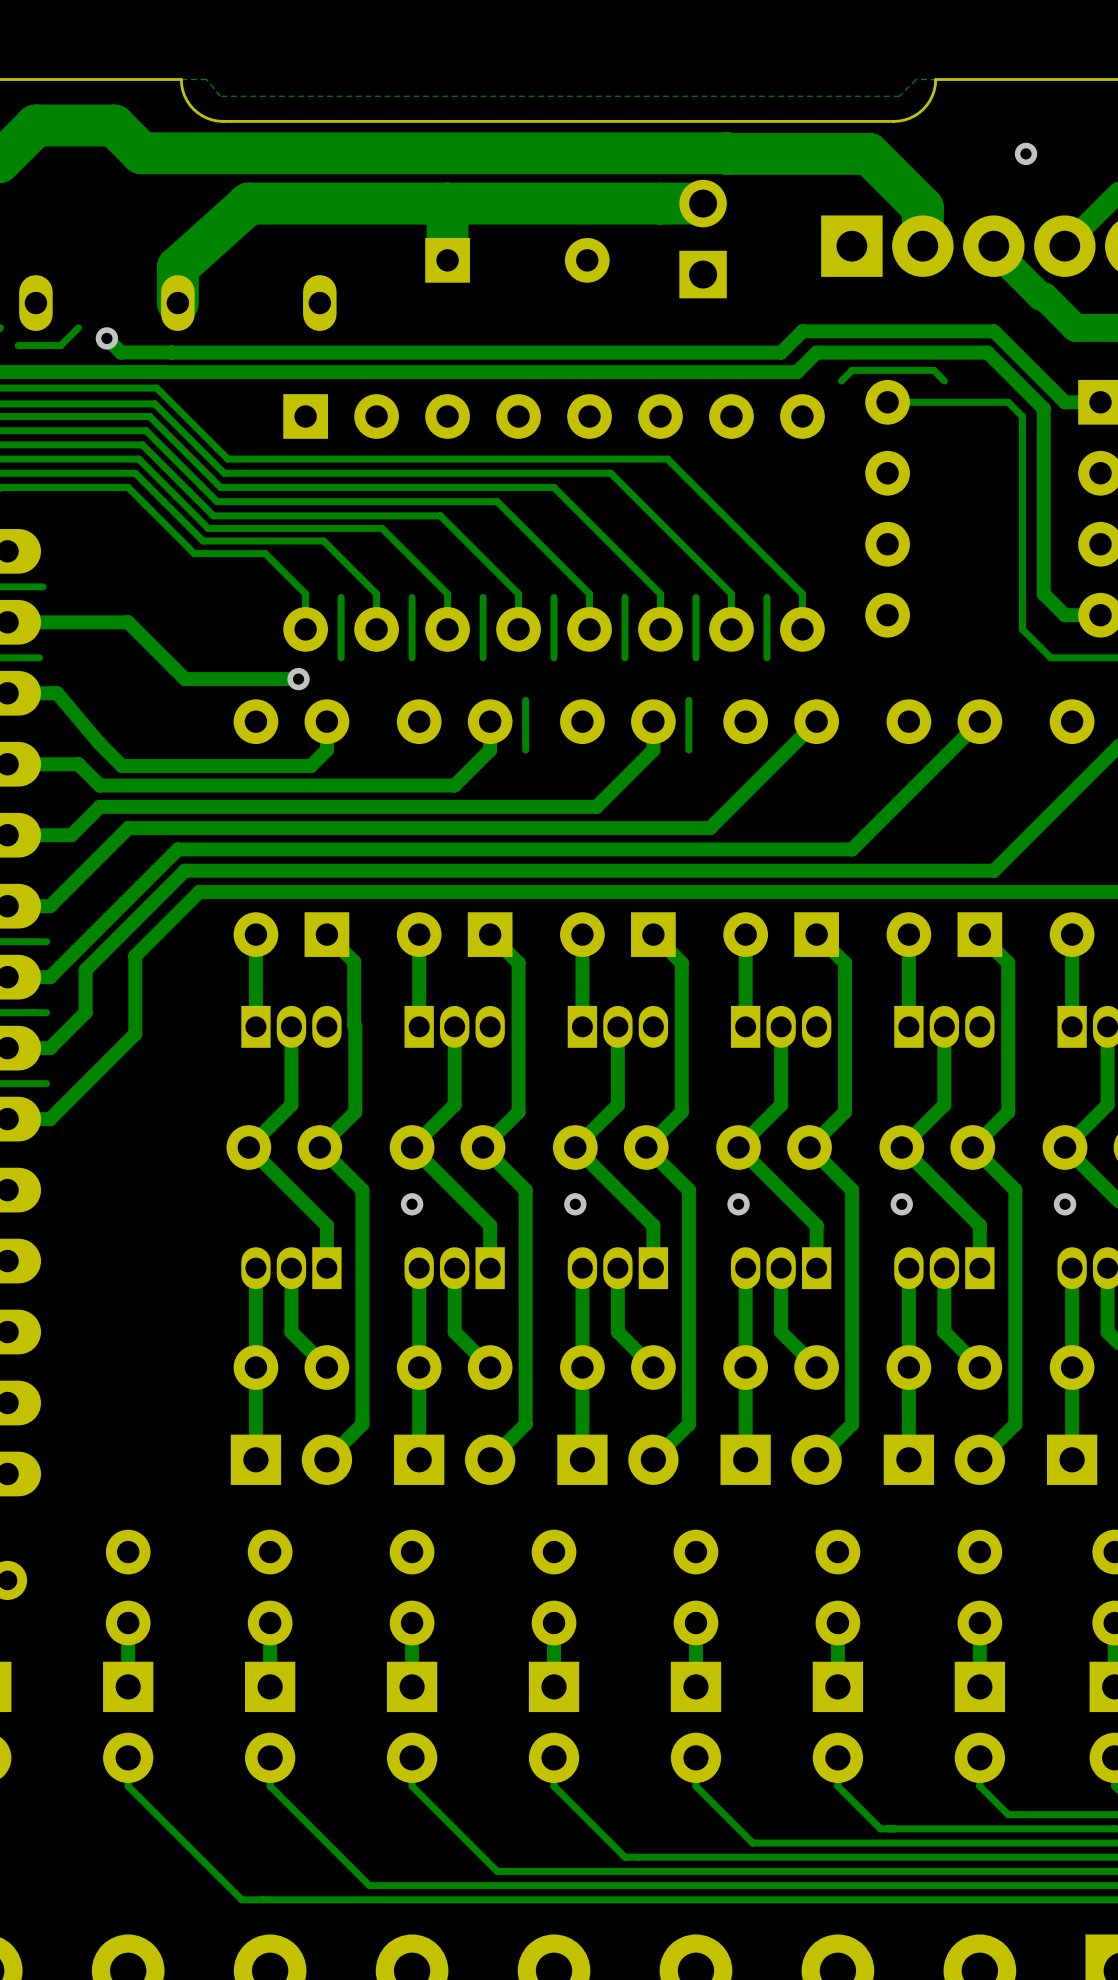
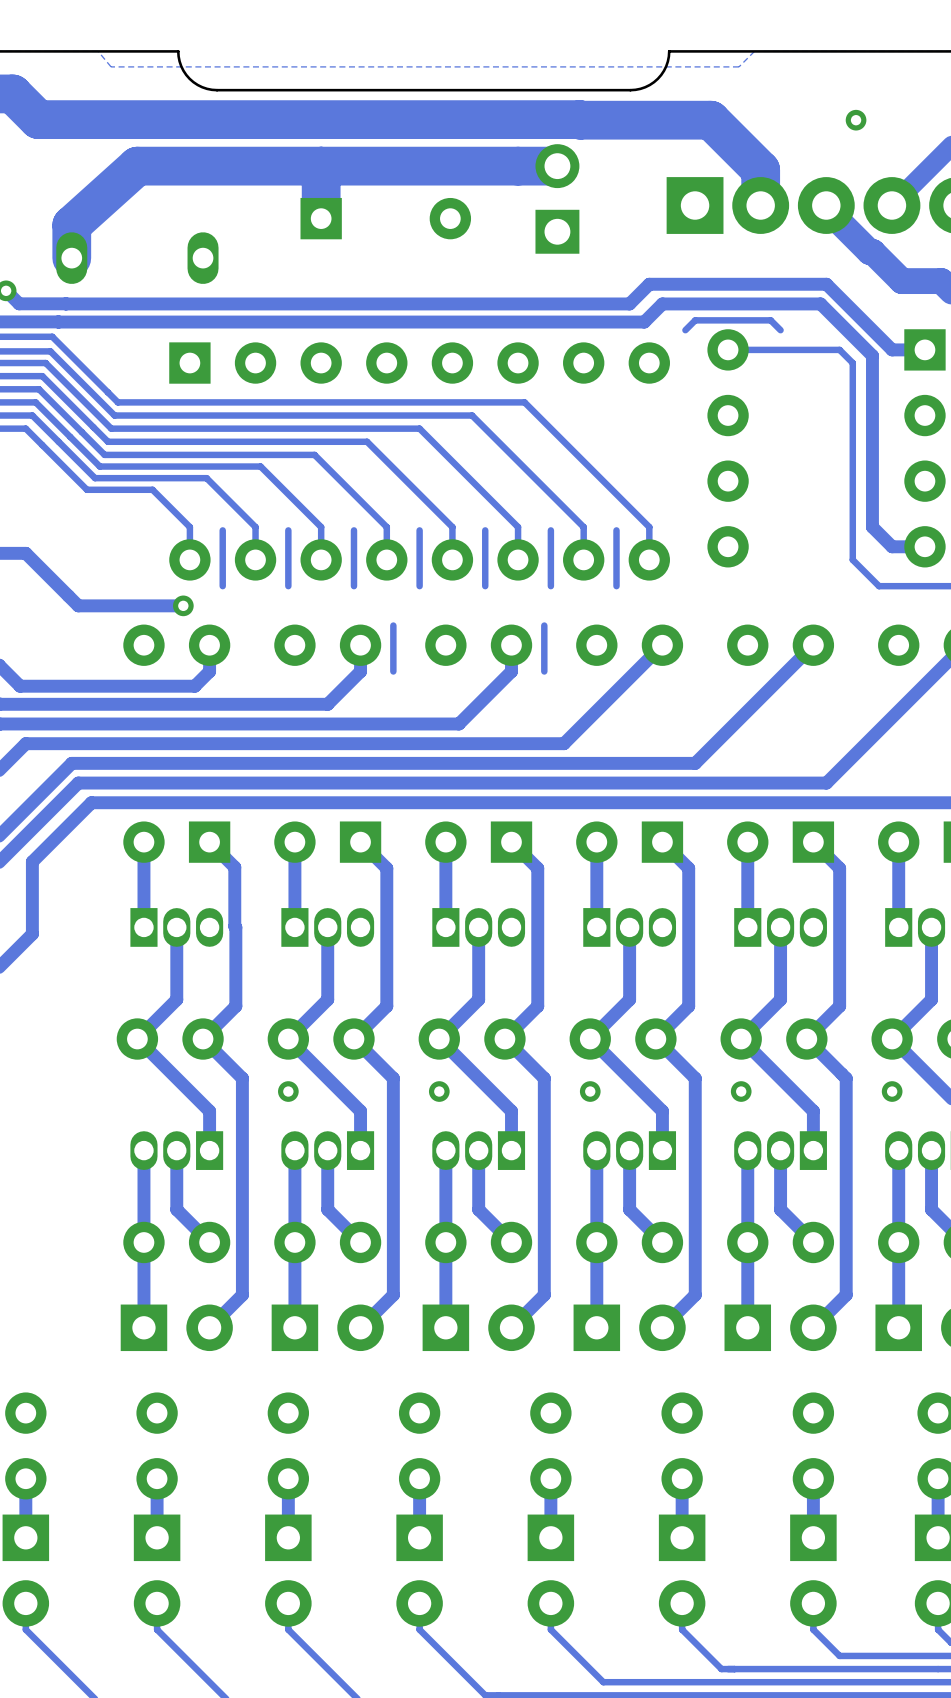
board edge: (181, 79) (182, 90) (189, 105) (197, 112) (212, 120) (334, 121) -> (74, 51) (178, 51) (181, 66) (189, 78) (202, 87) (217, 90)
board edge: (935, 79) (934, 90) (927, 105) (919, 112) (904, 120) (782, 121) -> (772, 51) (669, 51) (666, 66) (657, 78) (645, 87) (630, 90)

